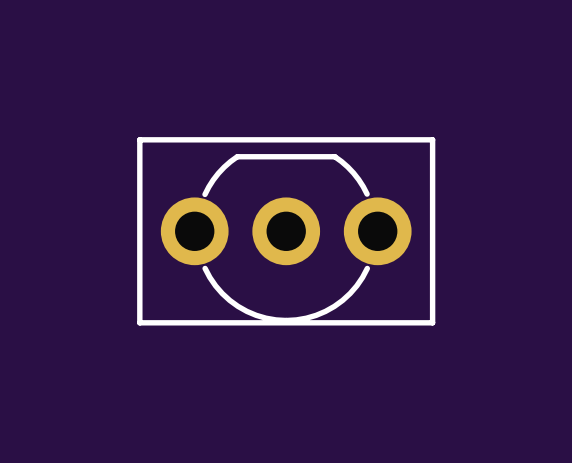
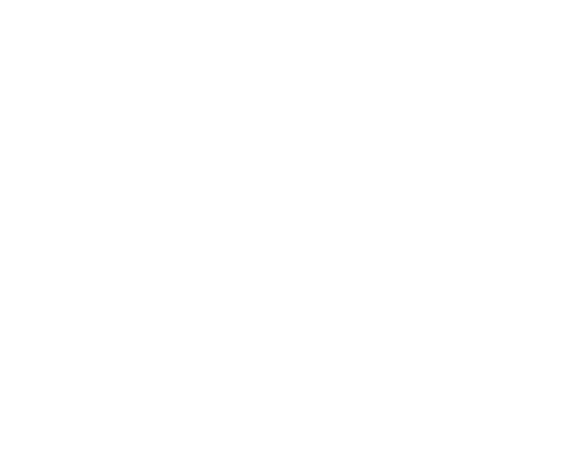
part: (286, 231) -> none

